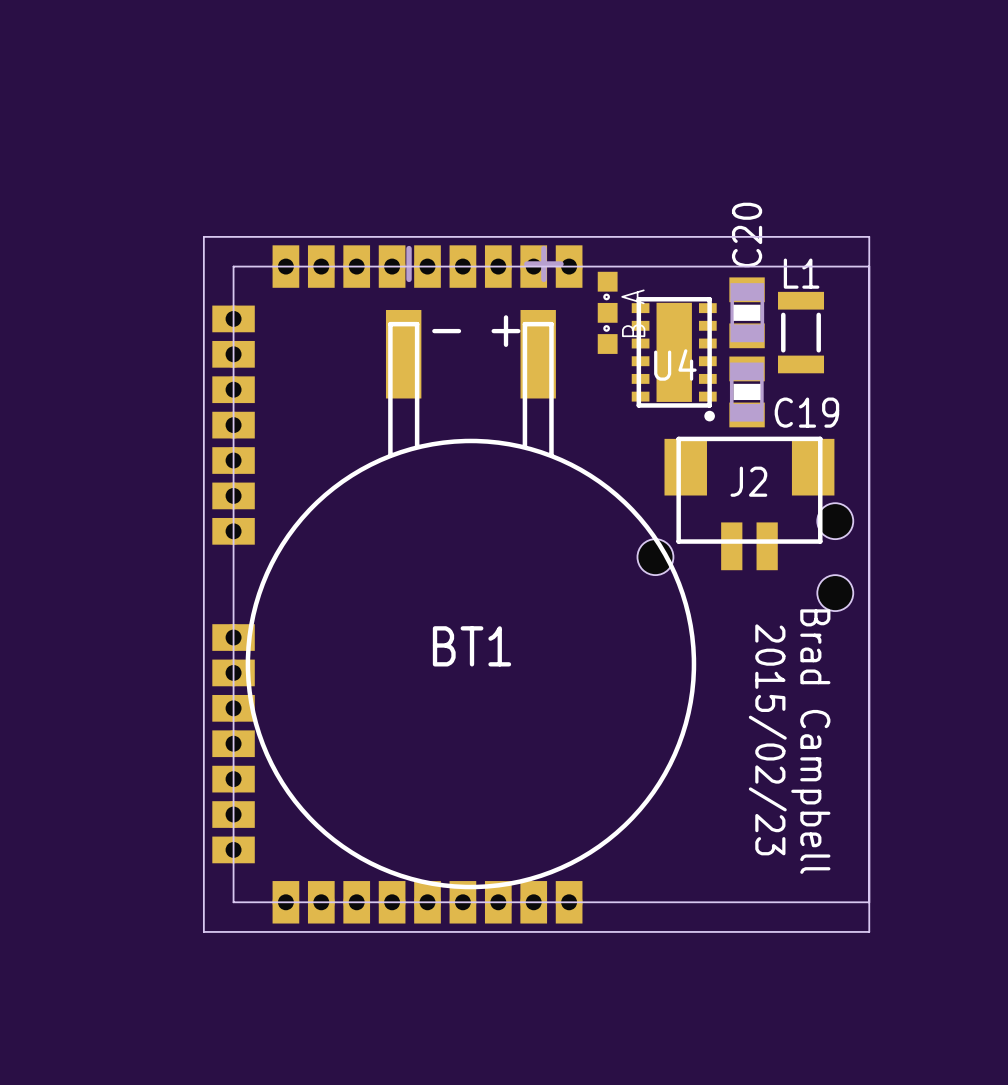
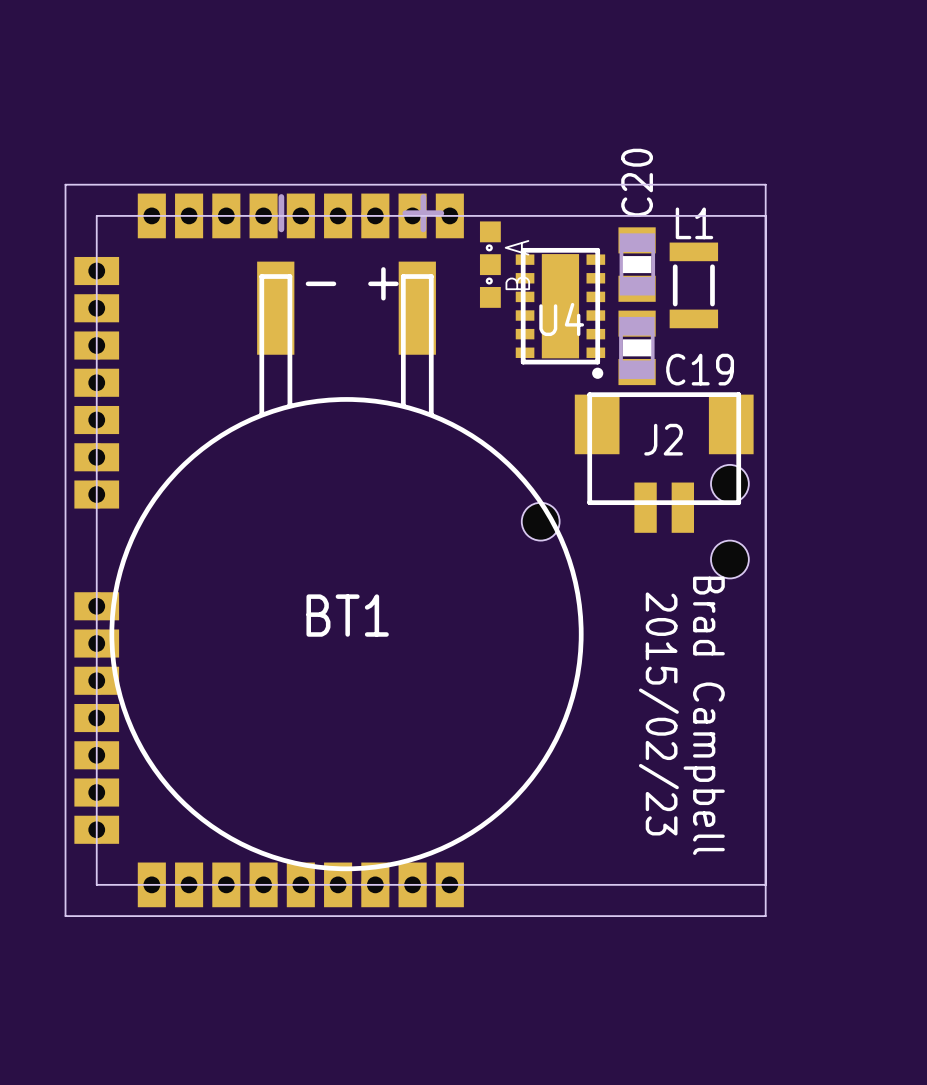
J2 position: (749, 503) -> (664, 462)

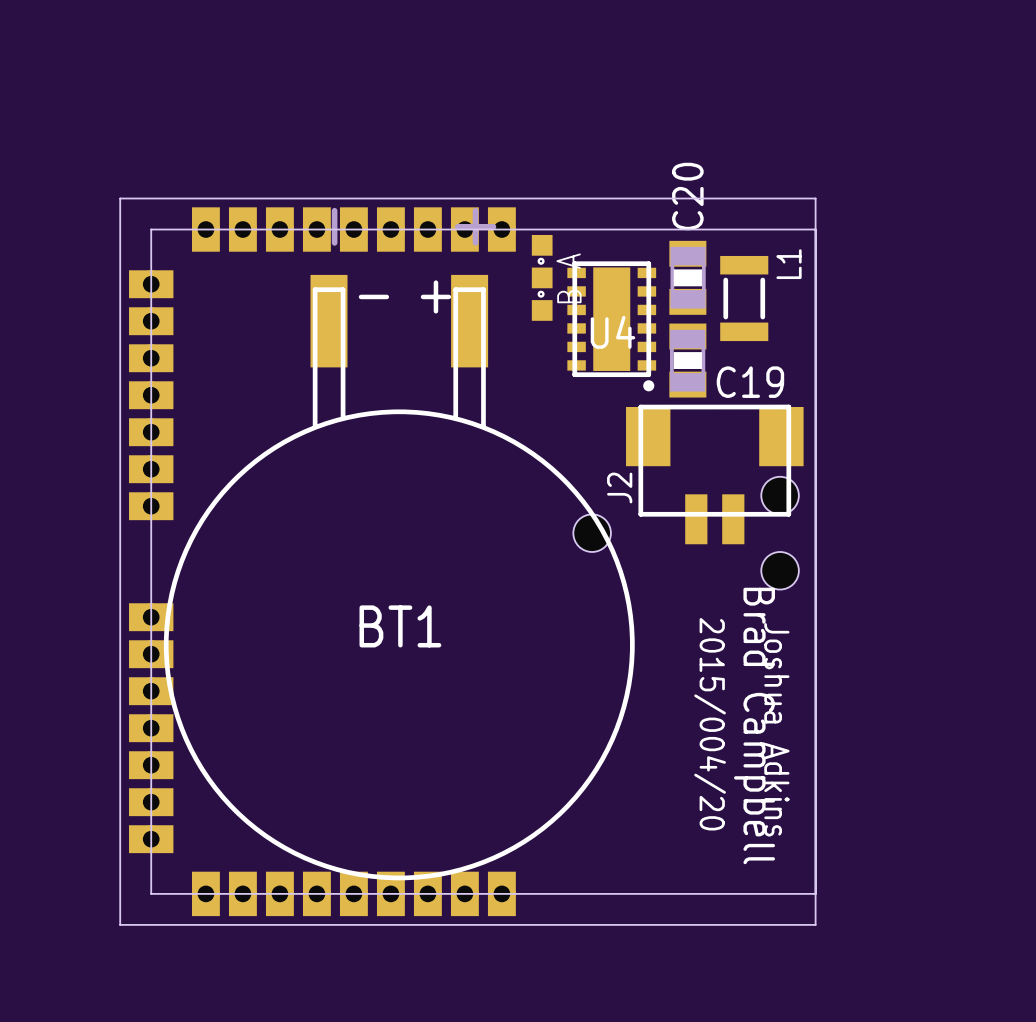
L1 name rotation: 0° (694, 223) -> 90° counterclockwise (789, 264)
J2 name rotation: 0° (663, 439) -> 90° counterclockwise (619, 487)
J2 name position: J2 (663, 439) -> J2 (619, 487)
text: 2015/02/23 (658, 713) -> 2015/004/20 (710, 724)
text: none -> Joshua Adkins (776, 729)

